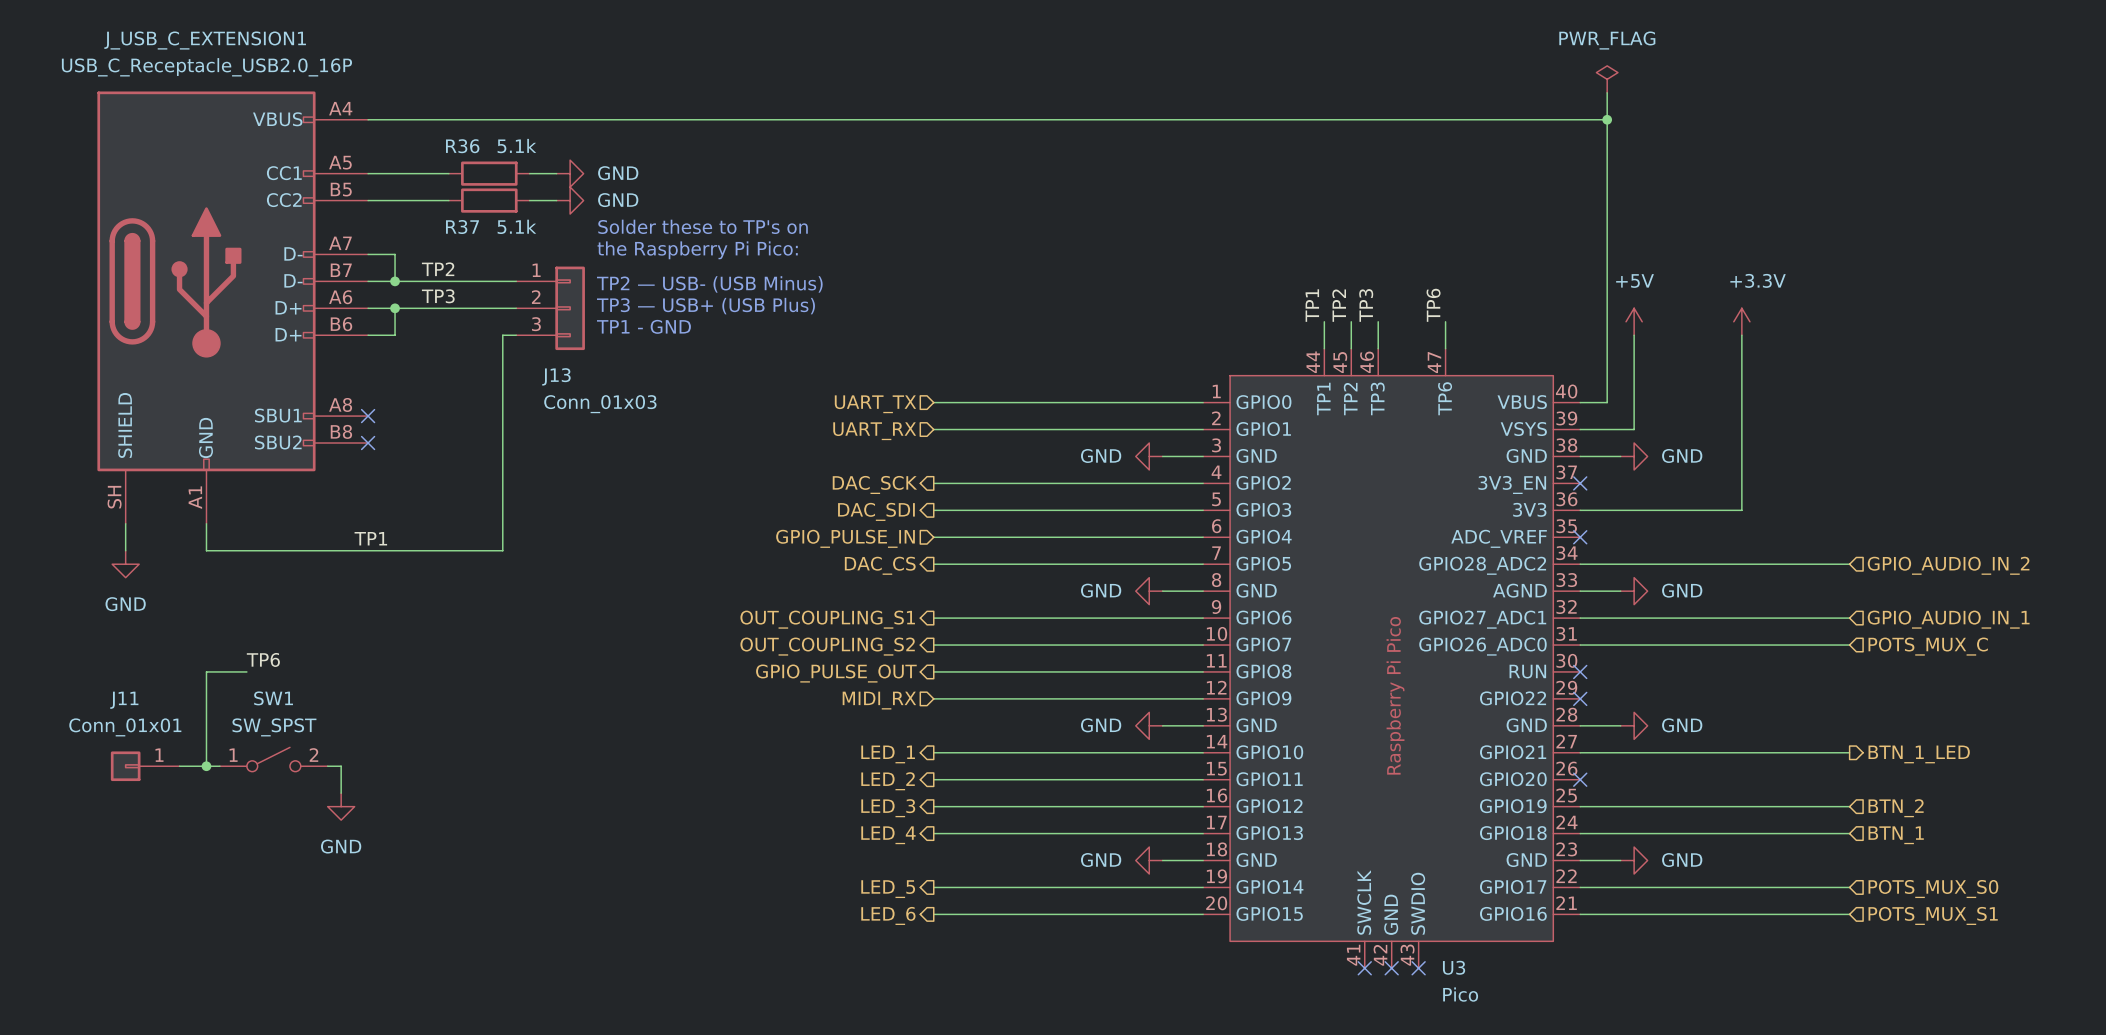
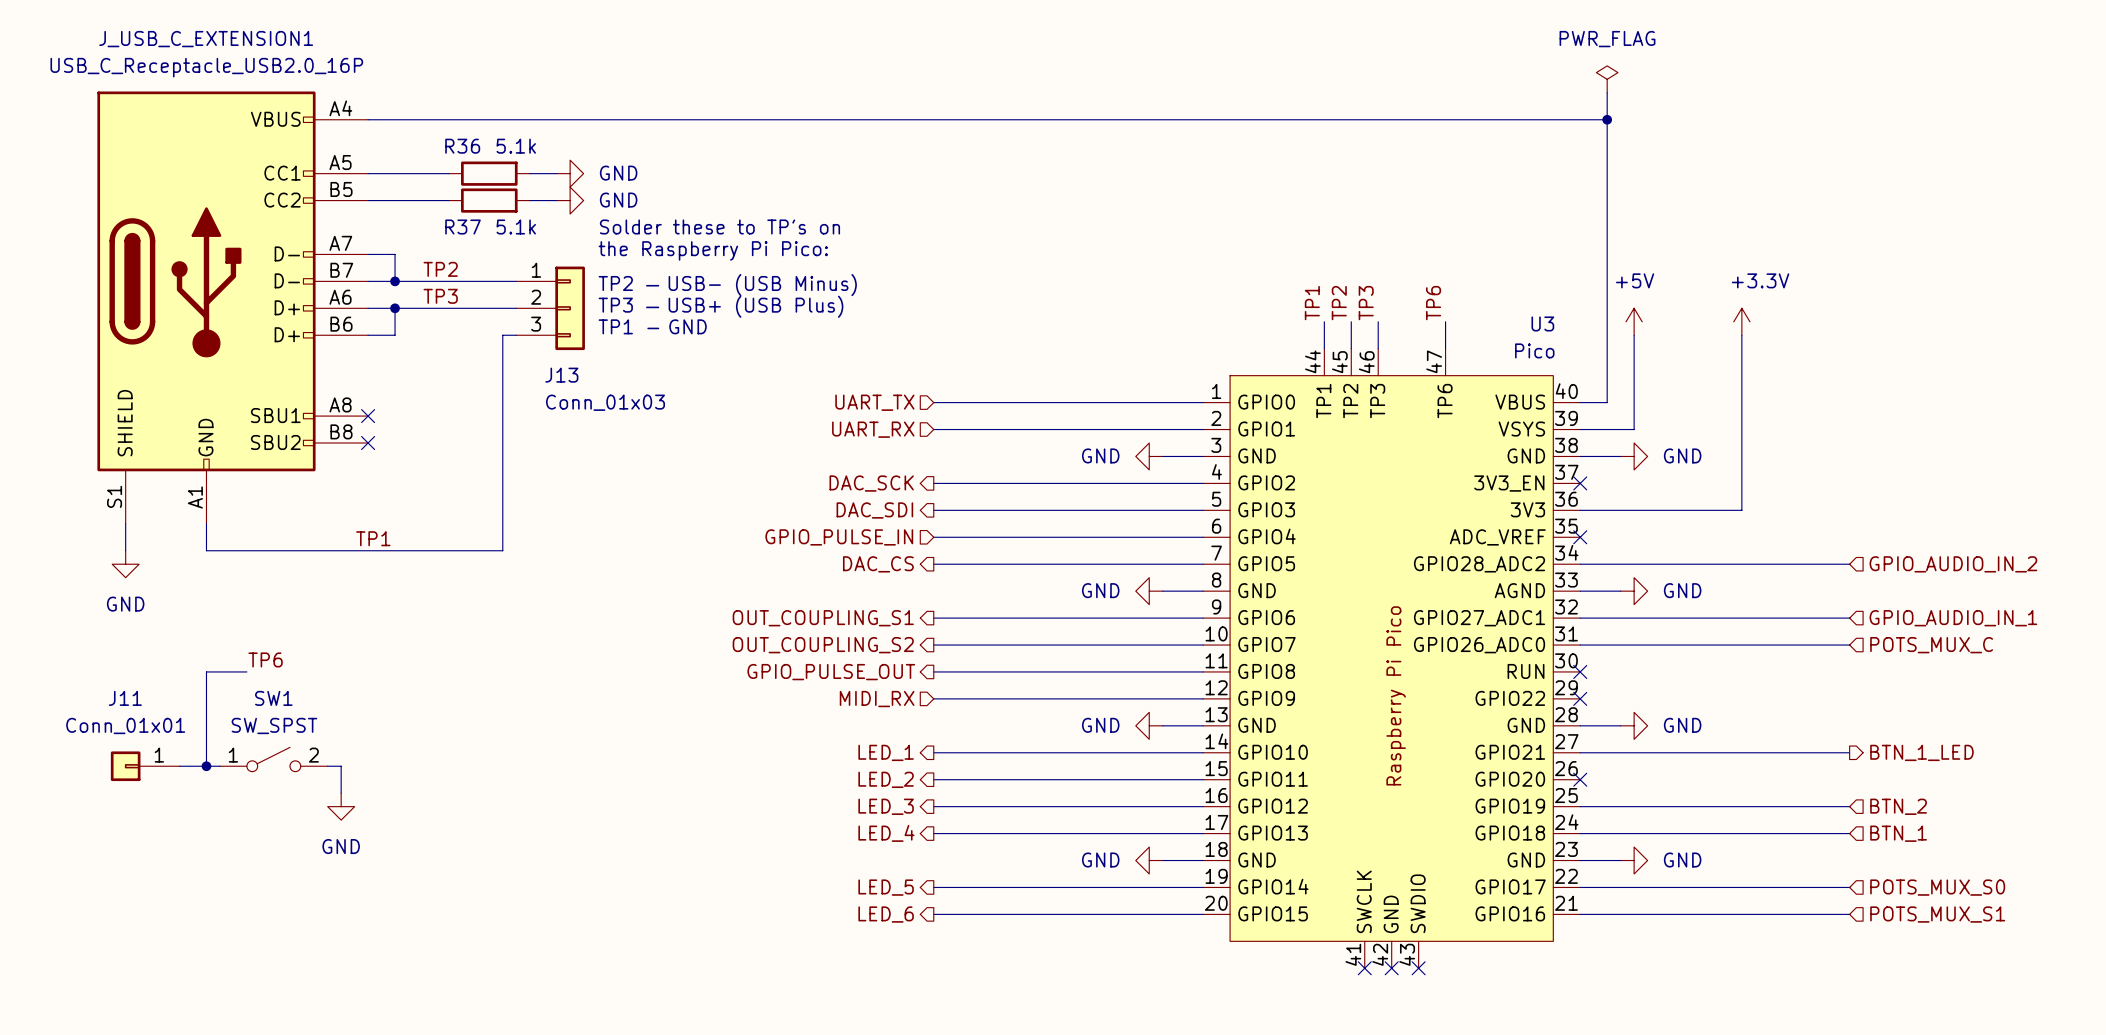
J_USB_C_EXTENSION1 pin number: SH (114, 497) -> S1 (114, 496)
U3 name position: U3 (1454, 967) -> U3 (1542, 323)
U3 value position: Pico (1460, 994) -> Pico (1534, 350)

